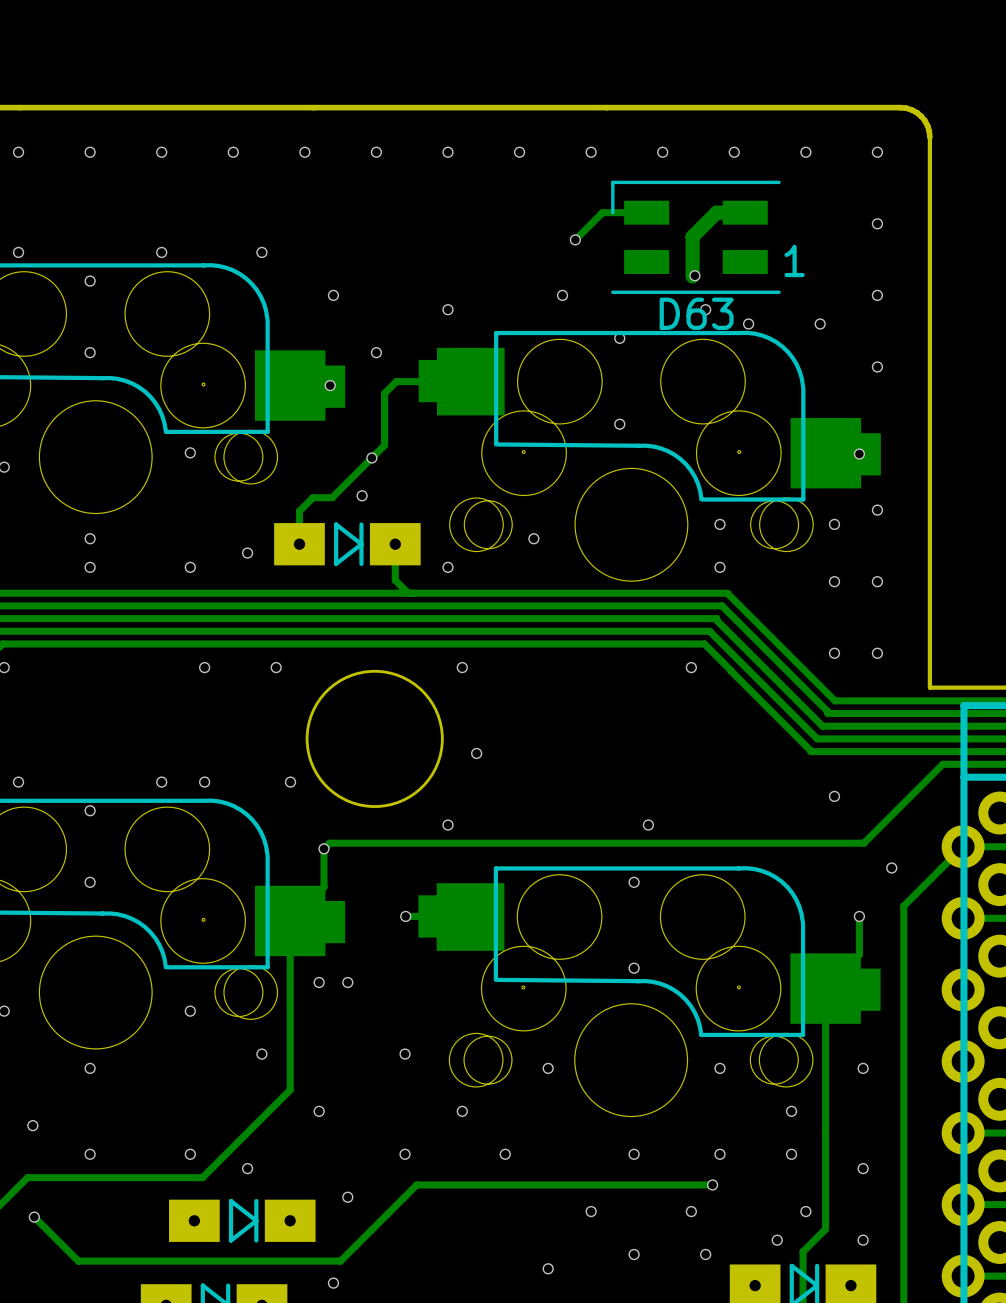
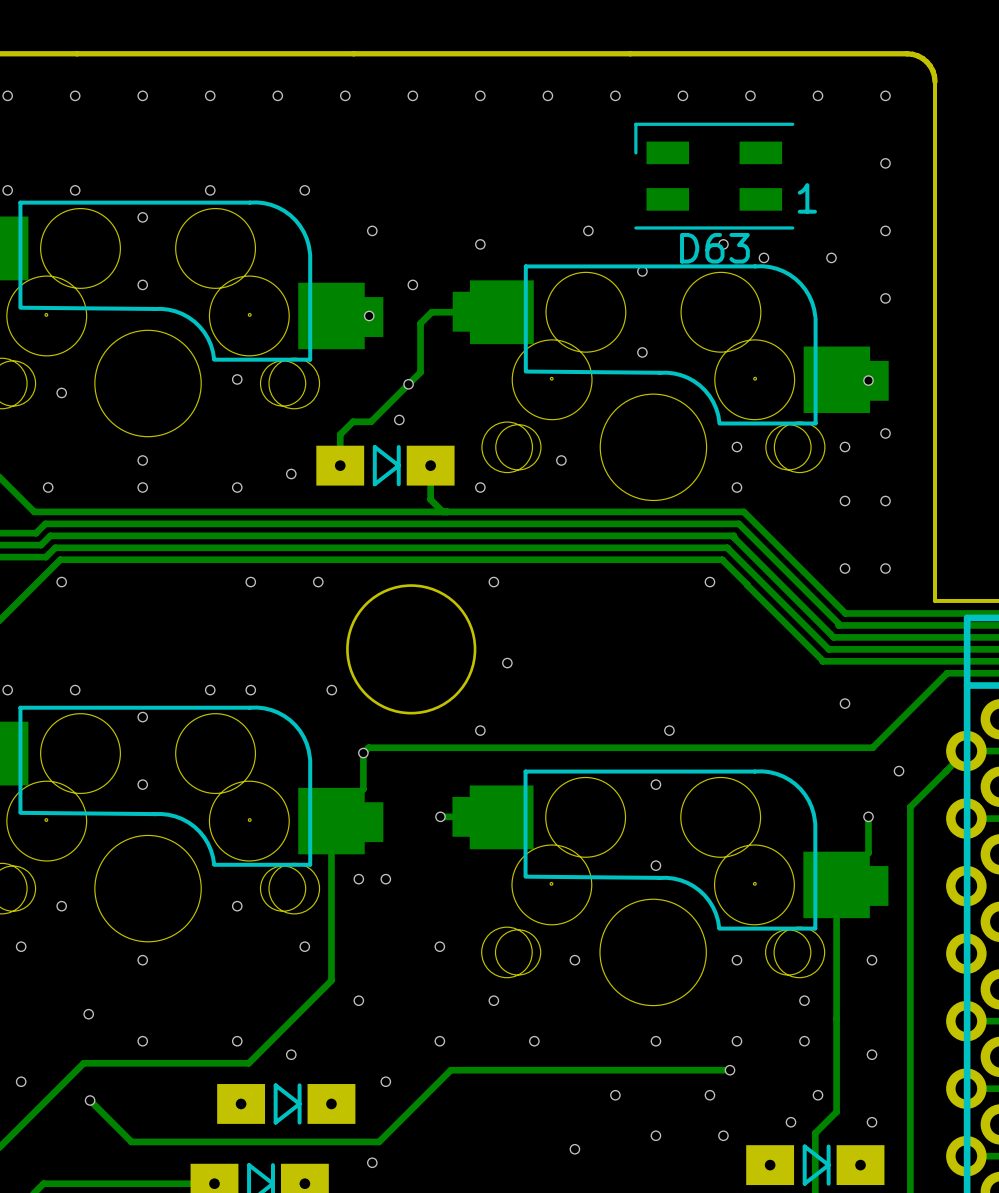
track: (646, 212) (602, 212) (575, 239) -> none
track: (745, 212) (716, 212) (692, 236) (692, 276) -> none
via: (575, 239) -> none
via: (694, 275) -> none

